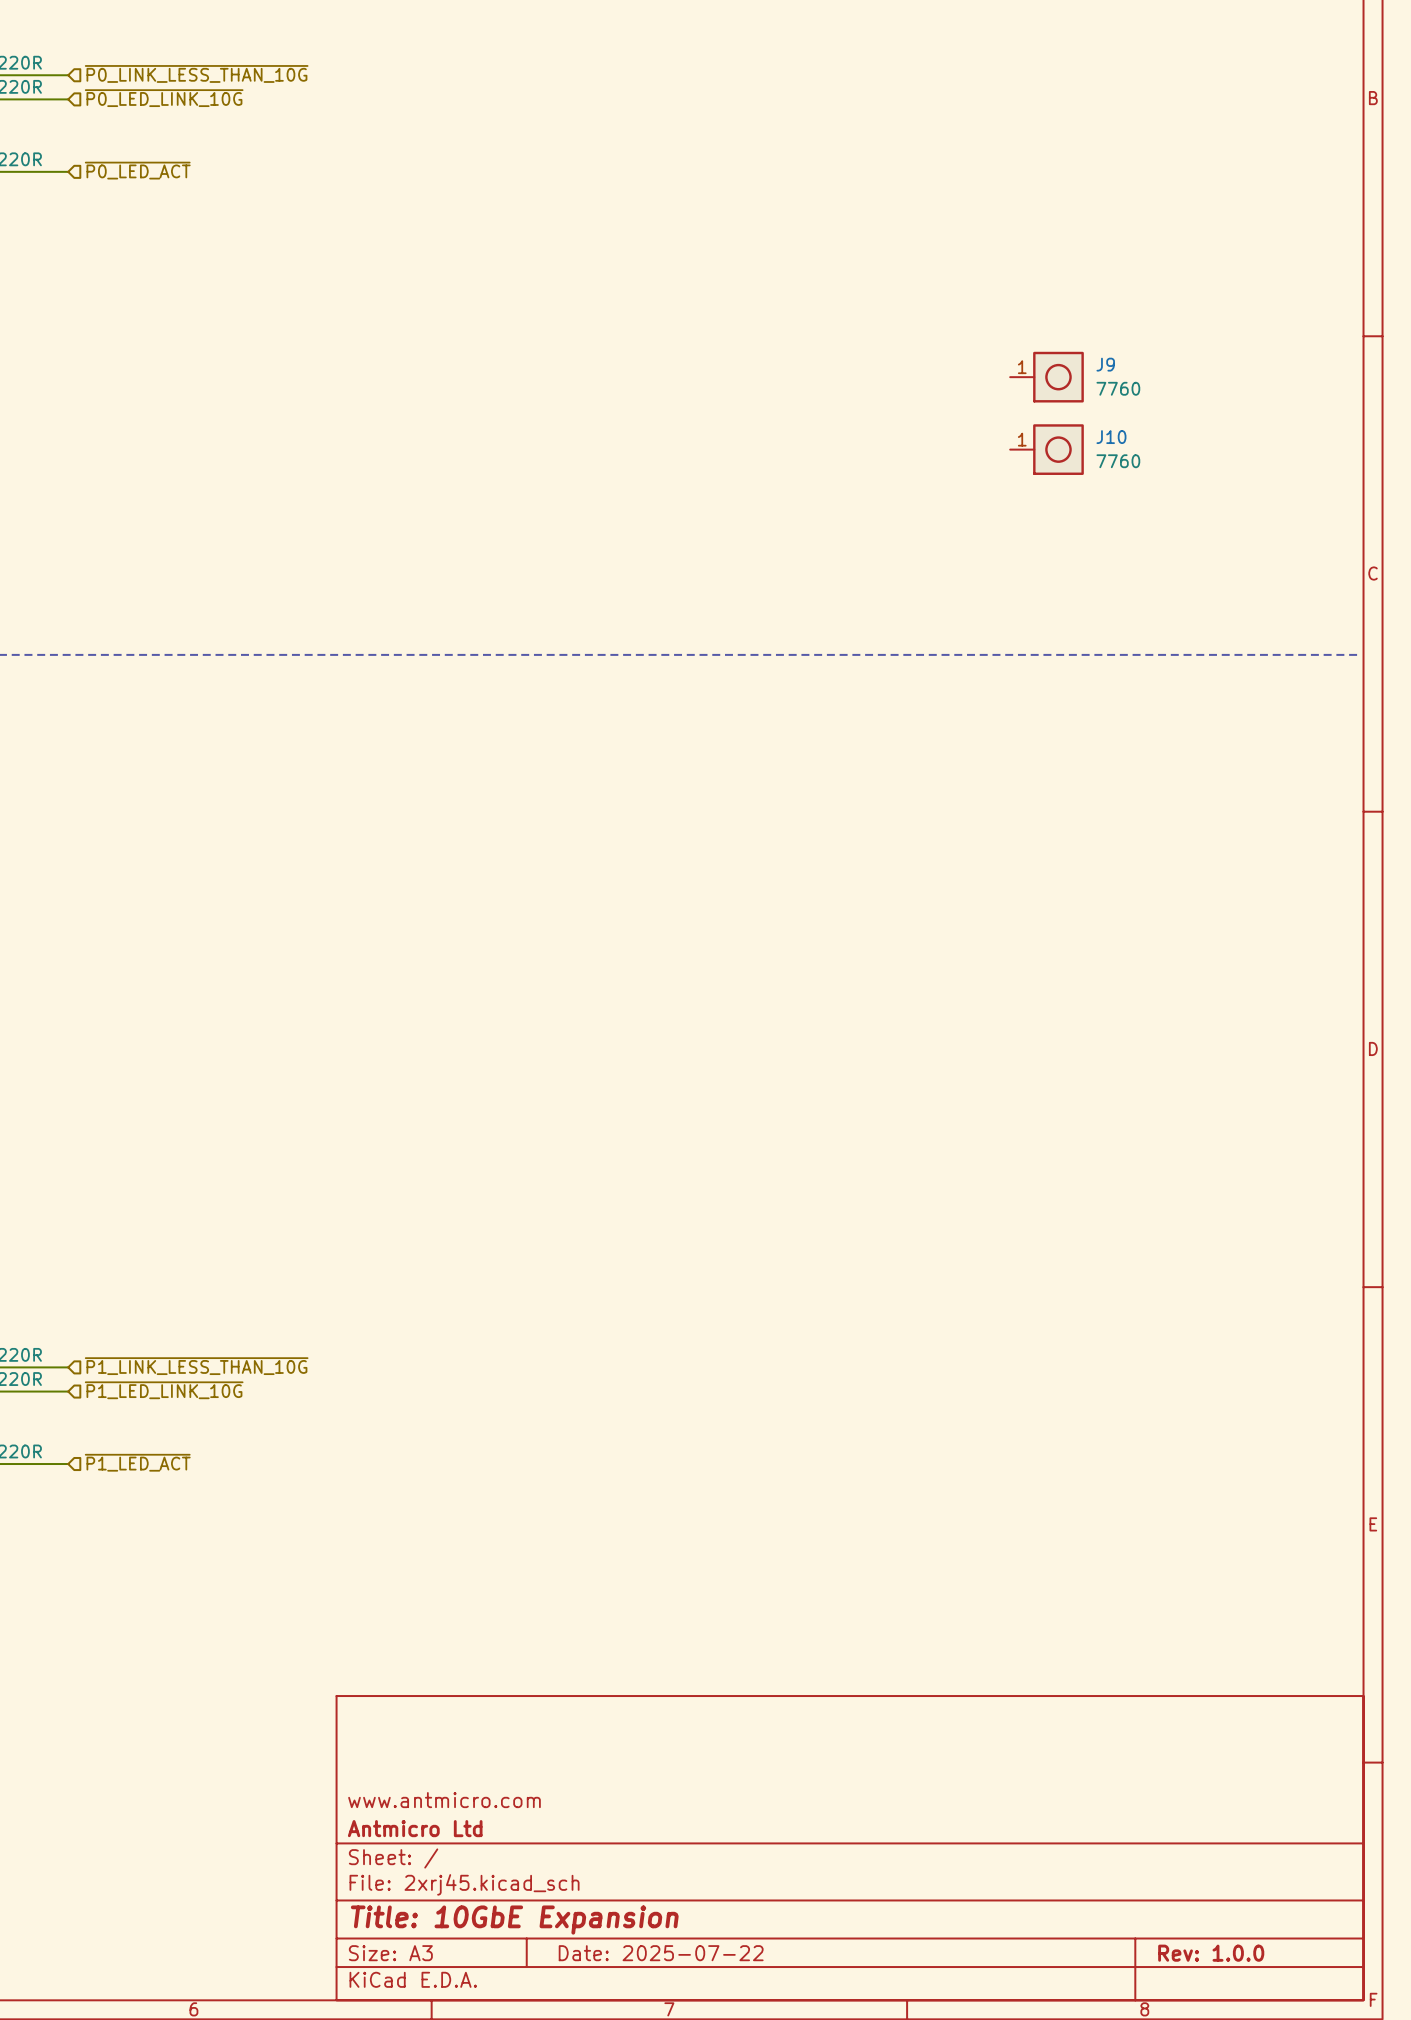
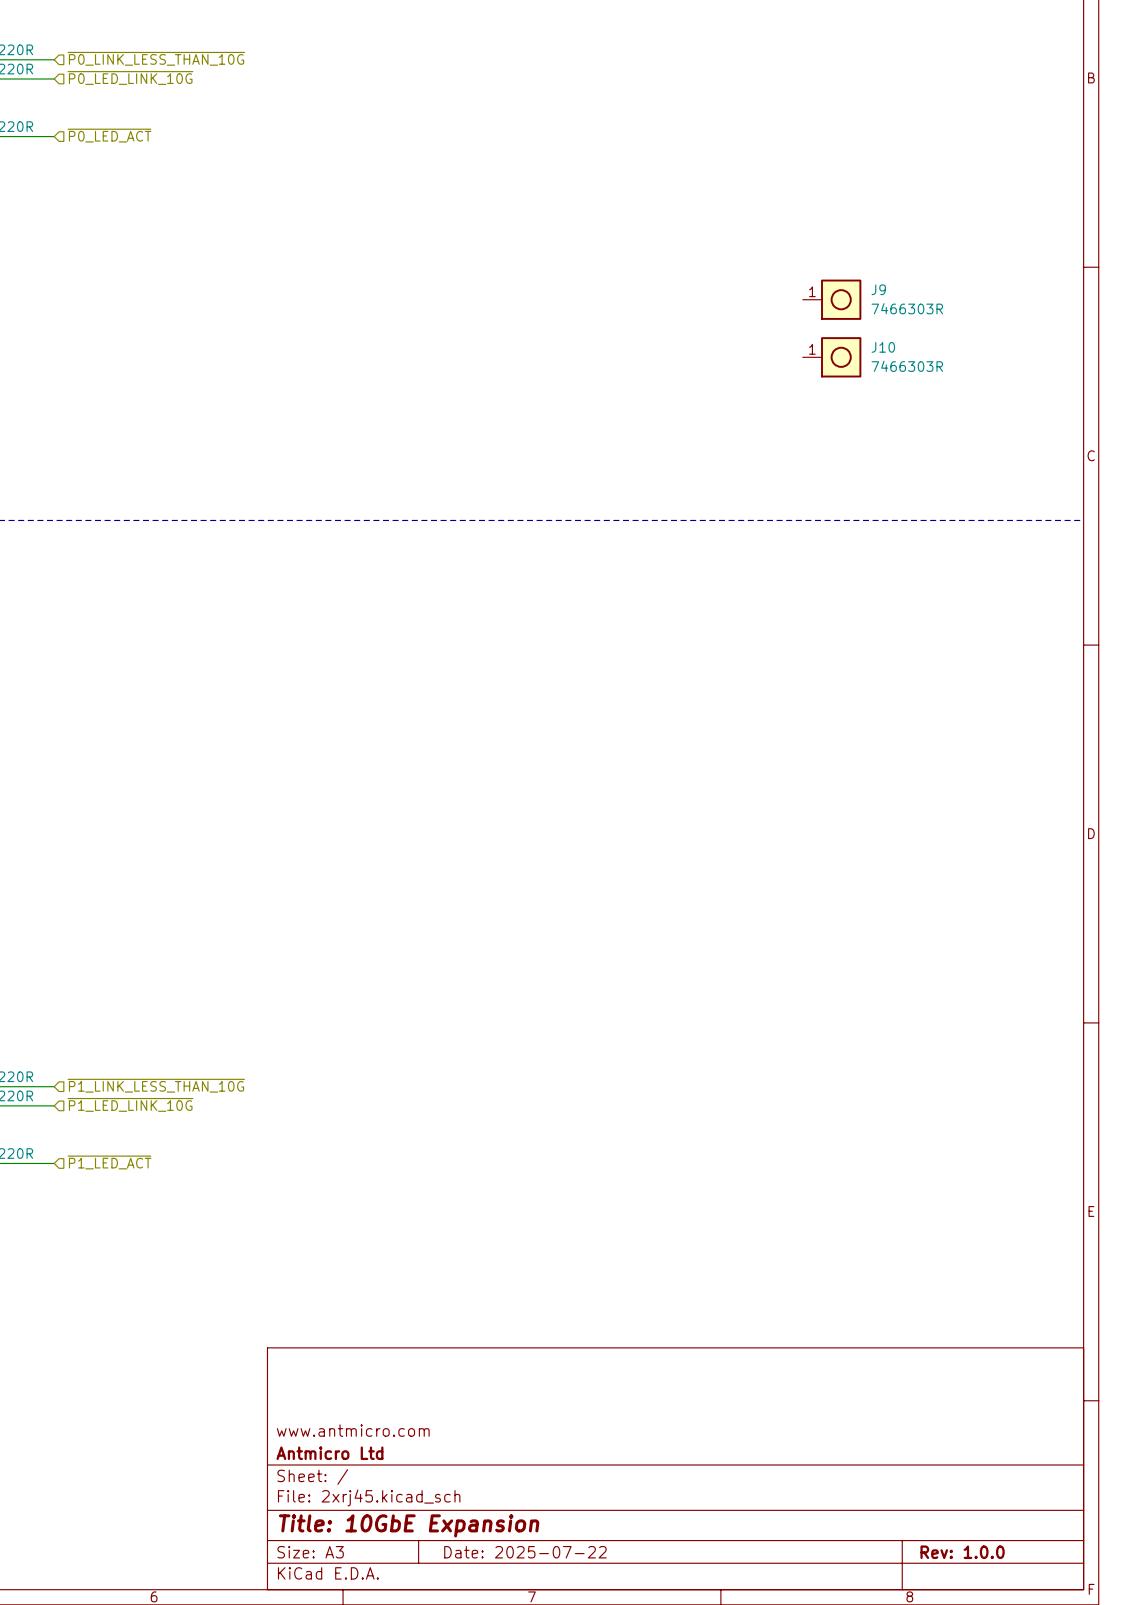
J9 text: 7760 (1118, 388) -> 7466303R (907, 308)
J10 text: 7760 (1118, 461) -> 7466303R (907, 366)

